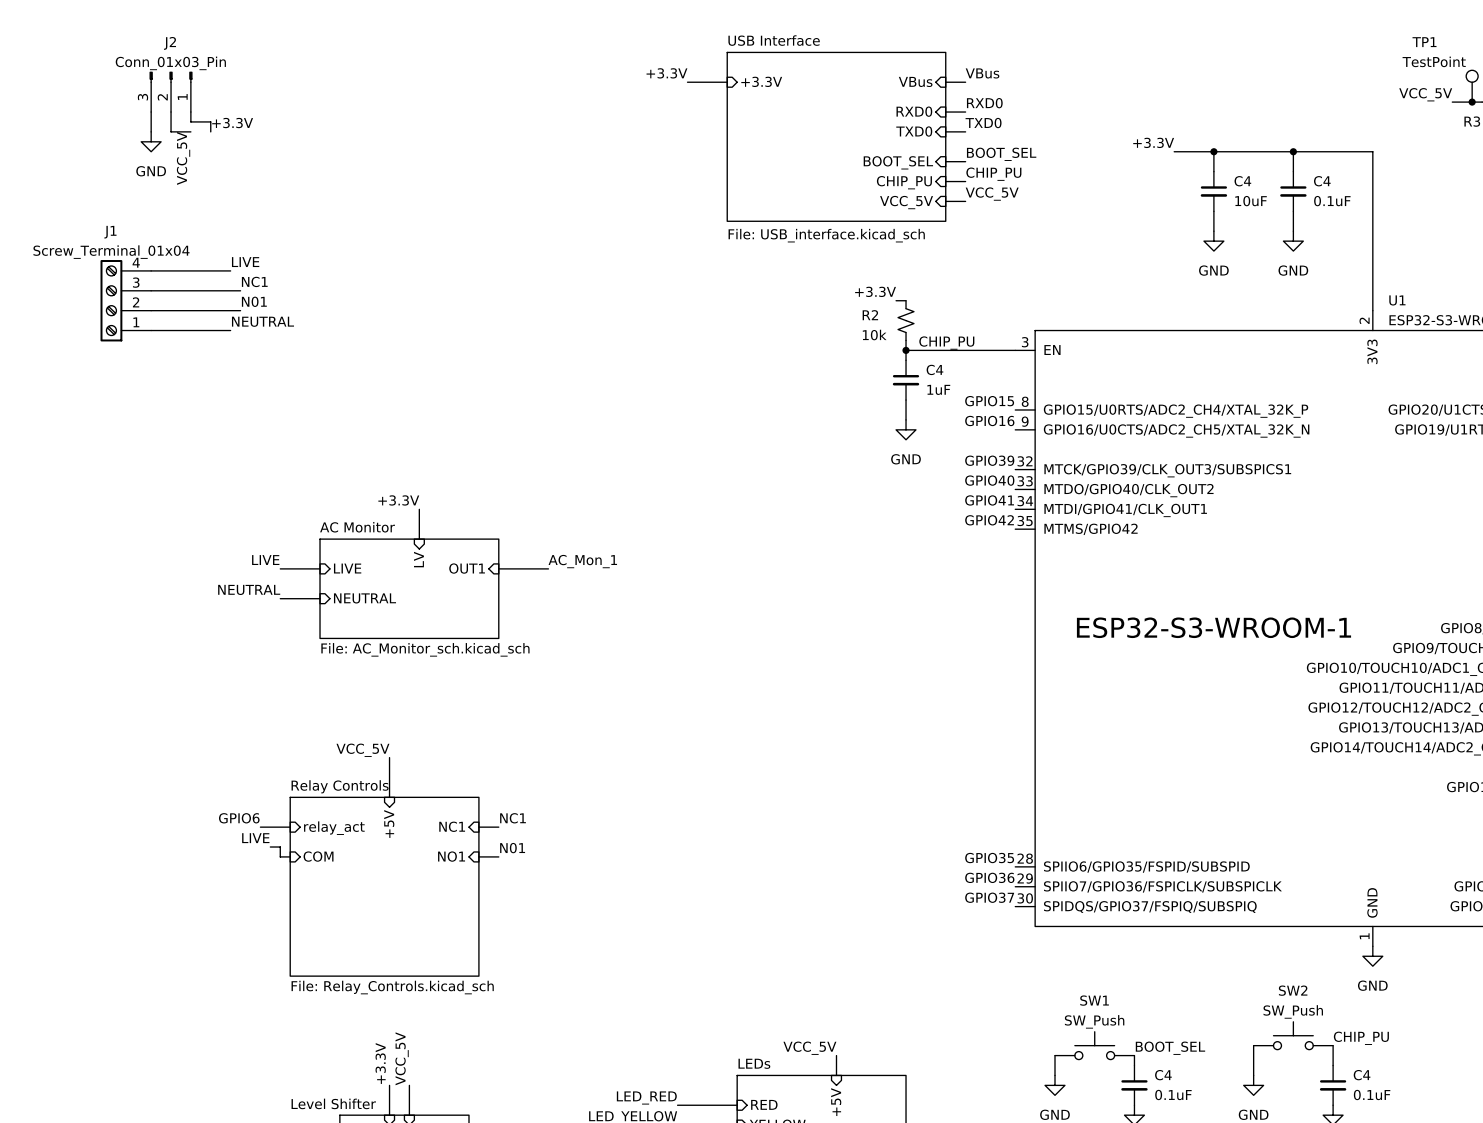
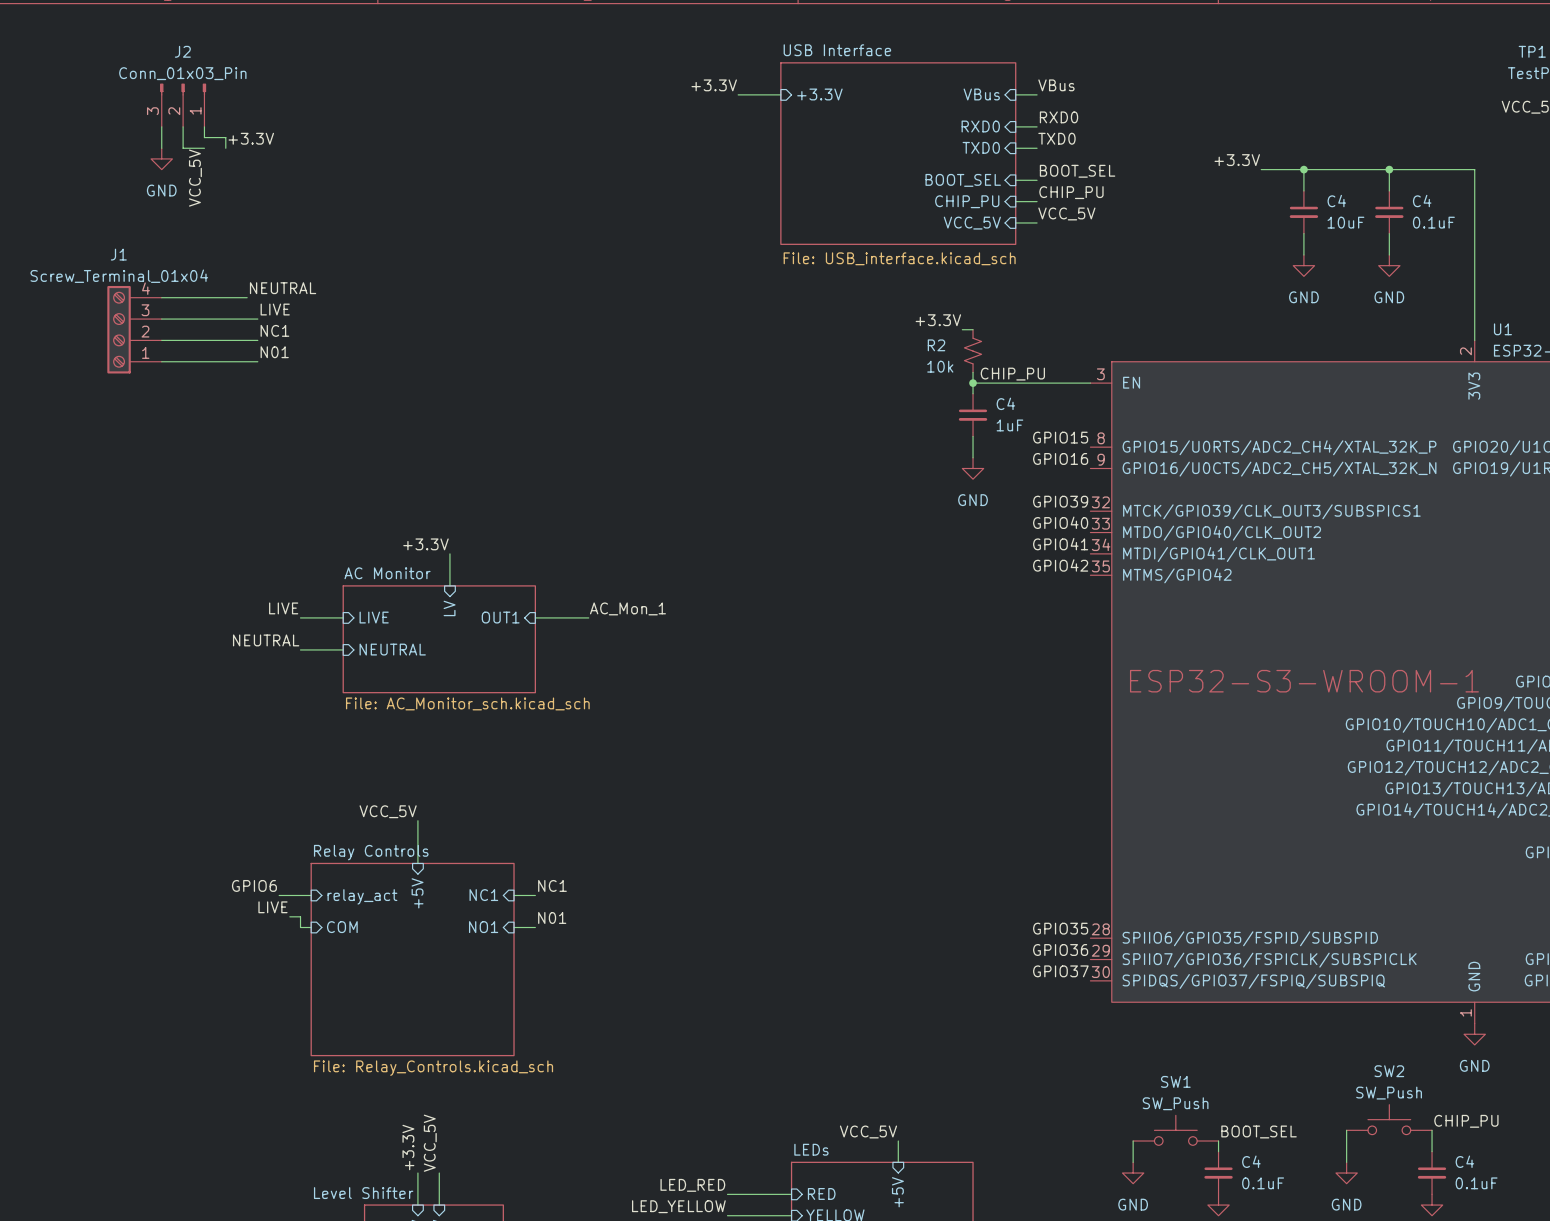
label: LIVE (245, 262) -> NEUTRAL (283, 288)
label: NC1 (254, 281) -> LIVE (275, 309)
label: N01 (254, 301) -> NC1 (274, 330)
label: none -> N01 (274, 352)
label: NEUTRAL (262, 321) -> none
wire: none -> (247, 361) (257, 361)

